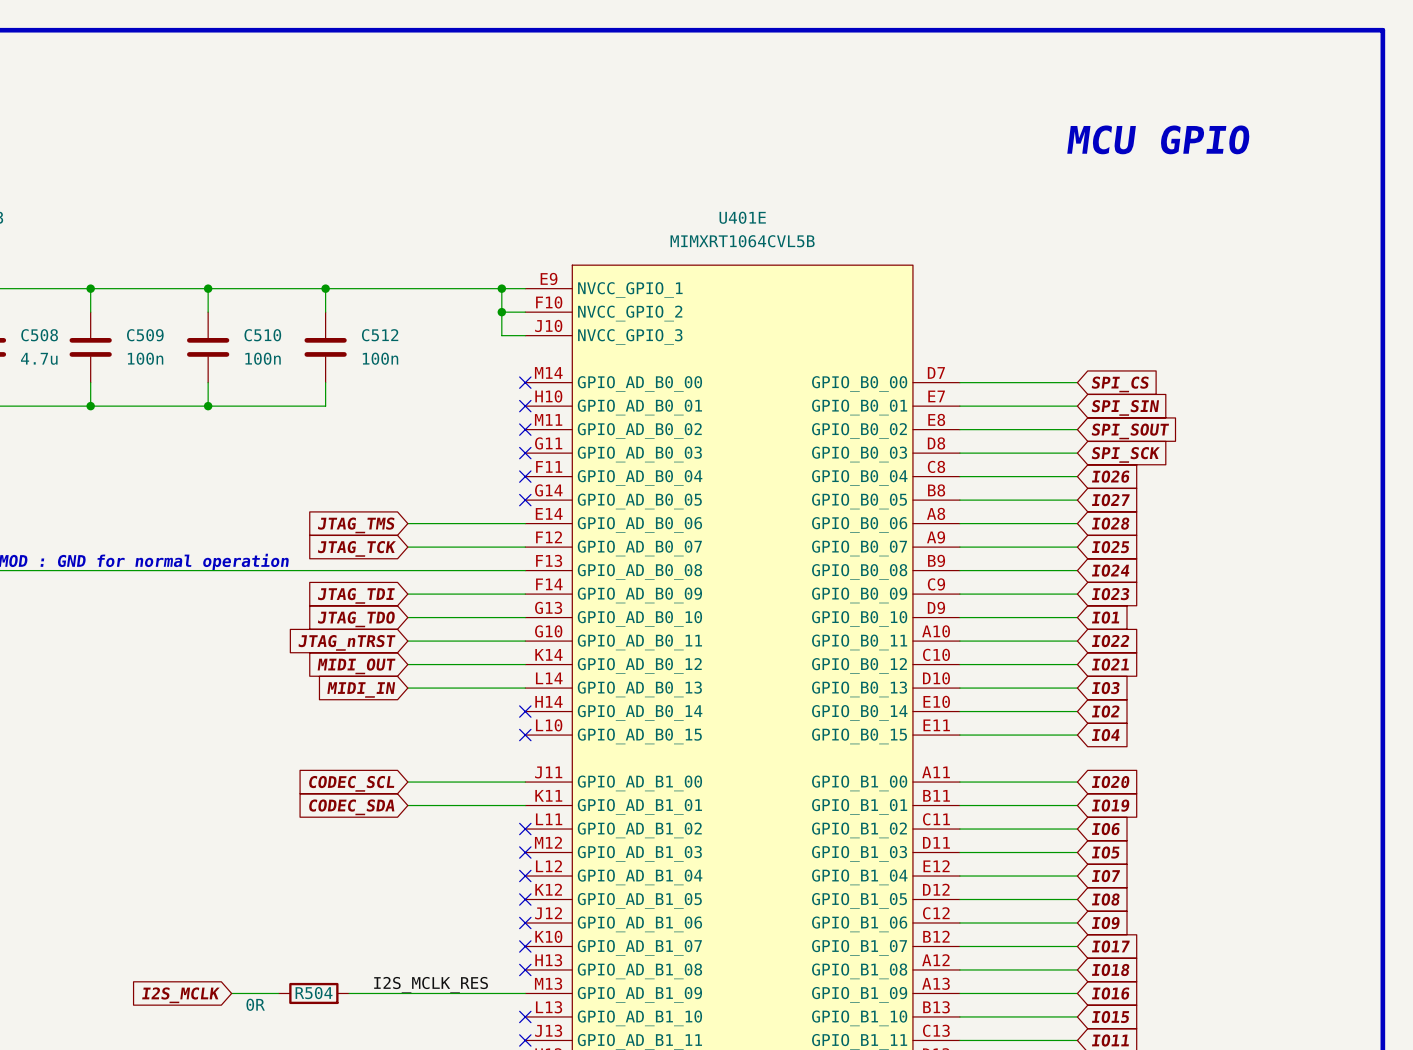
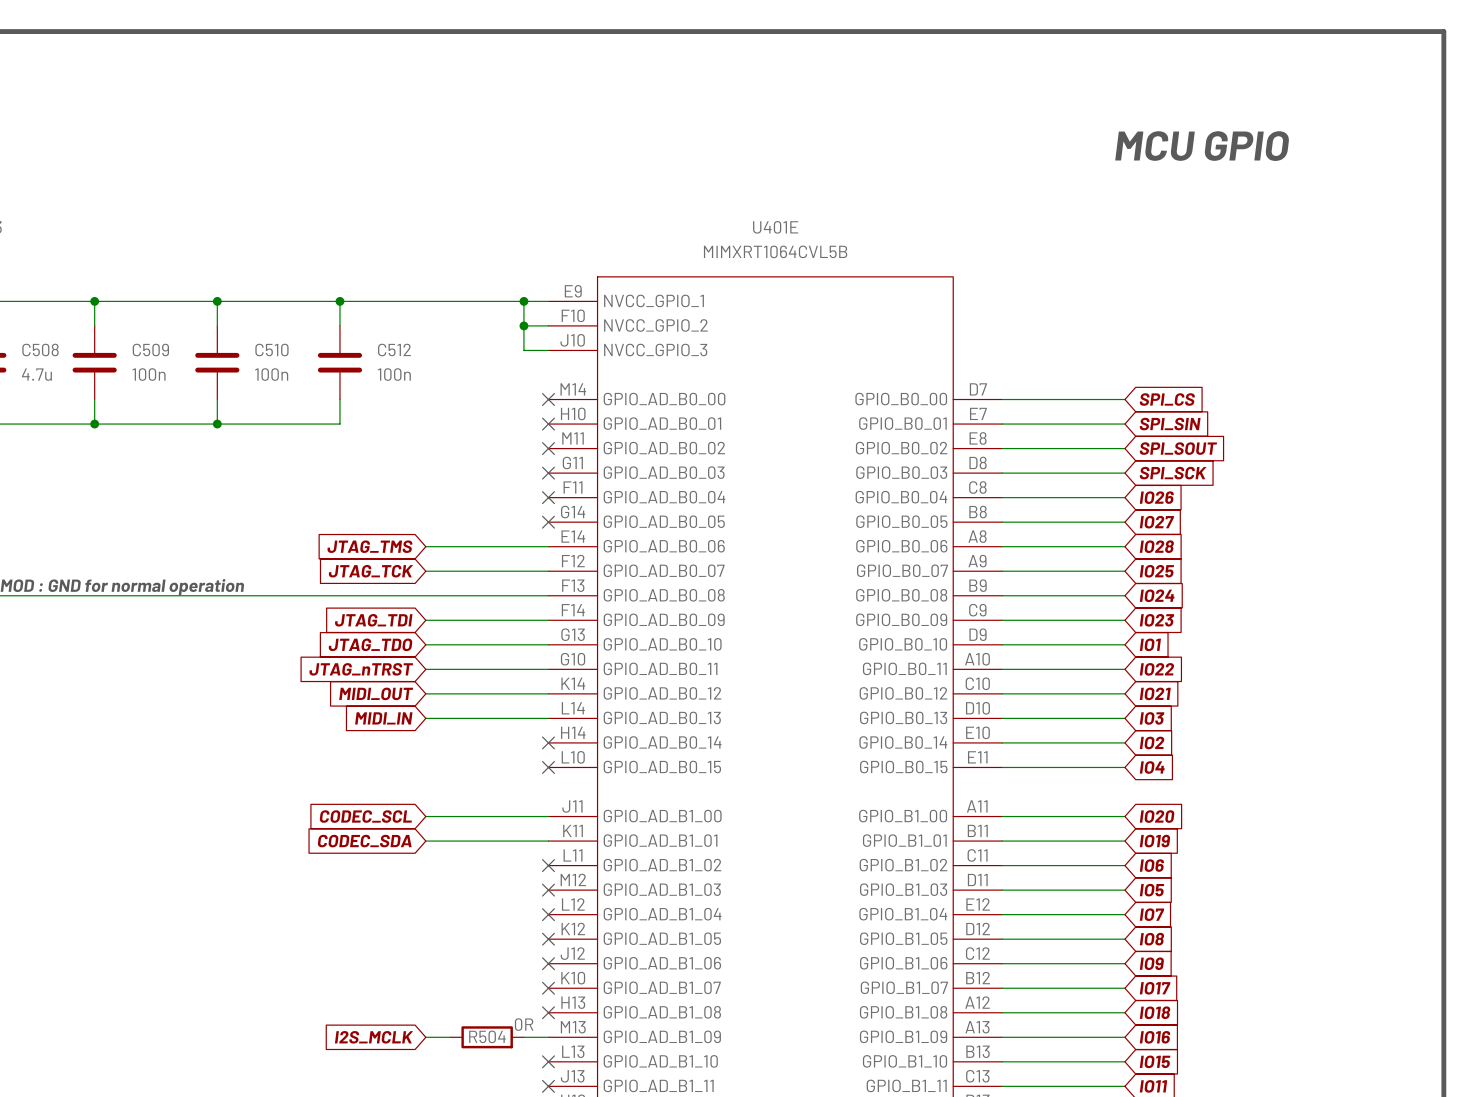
label: I2S_MCLK_RES (431, 984) -> none
wire: (231, 993) (278, 993) -> none
R504 position: (313, 993) -> (487, 1037)
wire: (349, 993) (407, 993) -> none
global label position: I2S_MCLK (180, 995) -> I2S_MCLK (373, 1037)
R504 value position: 0R (255, 1004) -> 0R (524, 1024)

